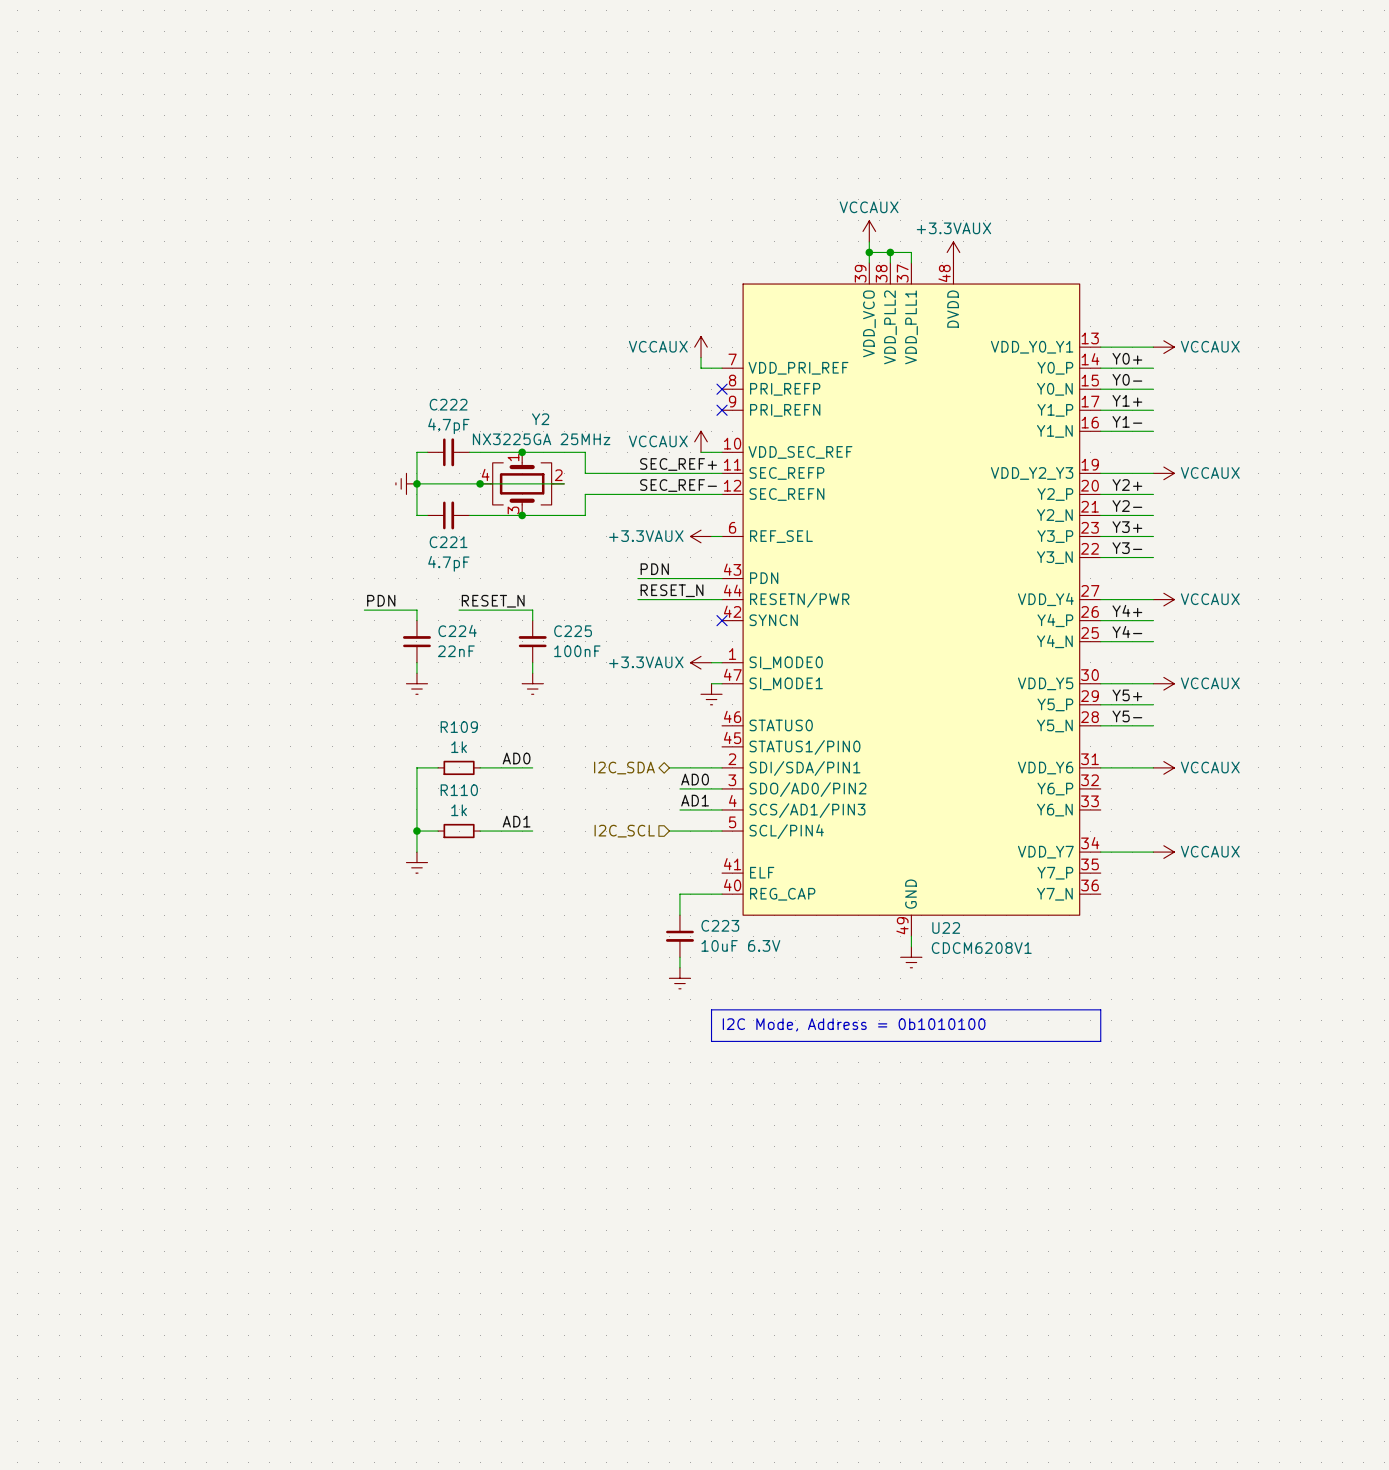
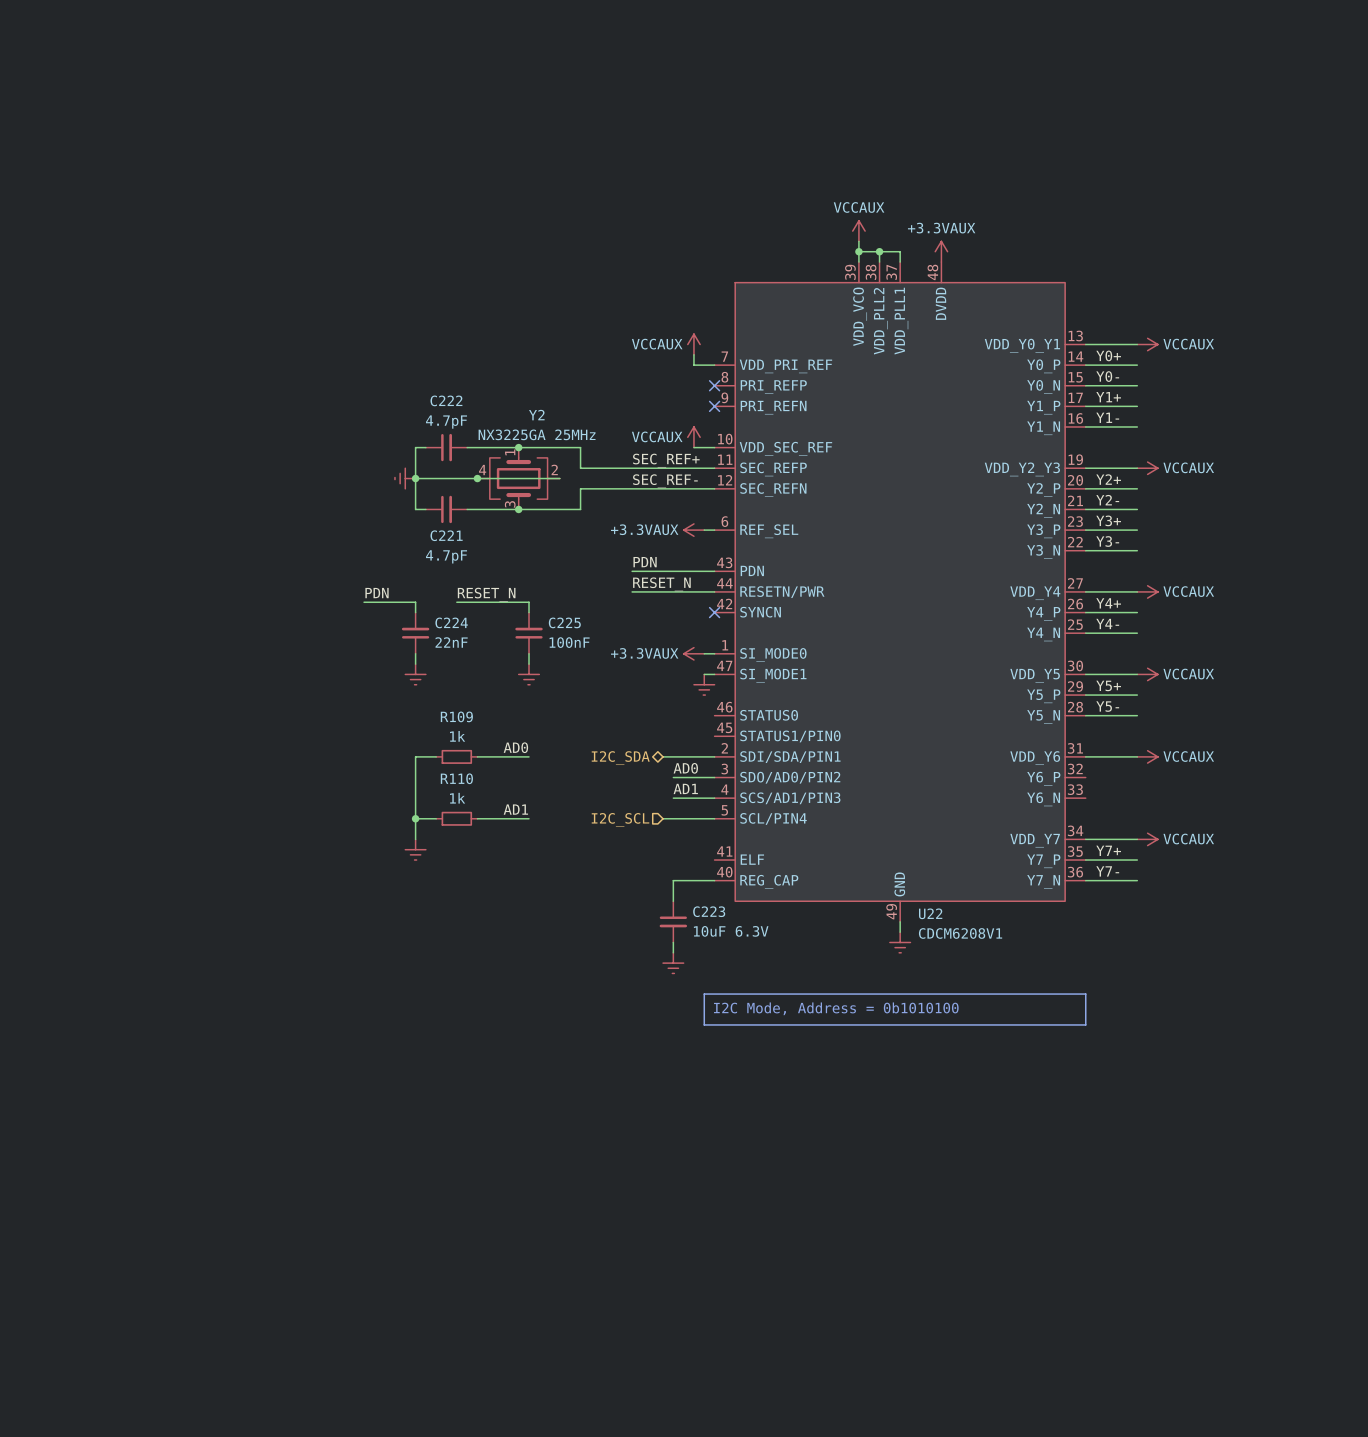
label: none -> Y7+ (1108, 850)
wire: none -> (1085, 860) (1137, 860)
label: none -> Y7- (1107, 871)
wire: none -> (1085, 880) (1137, 880)

